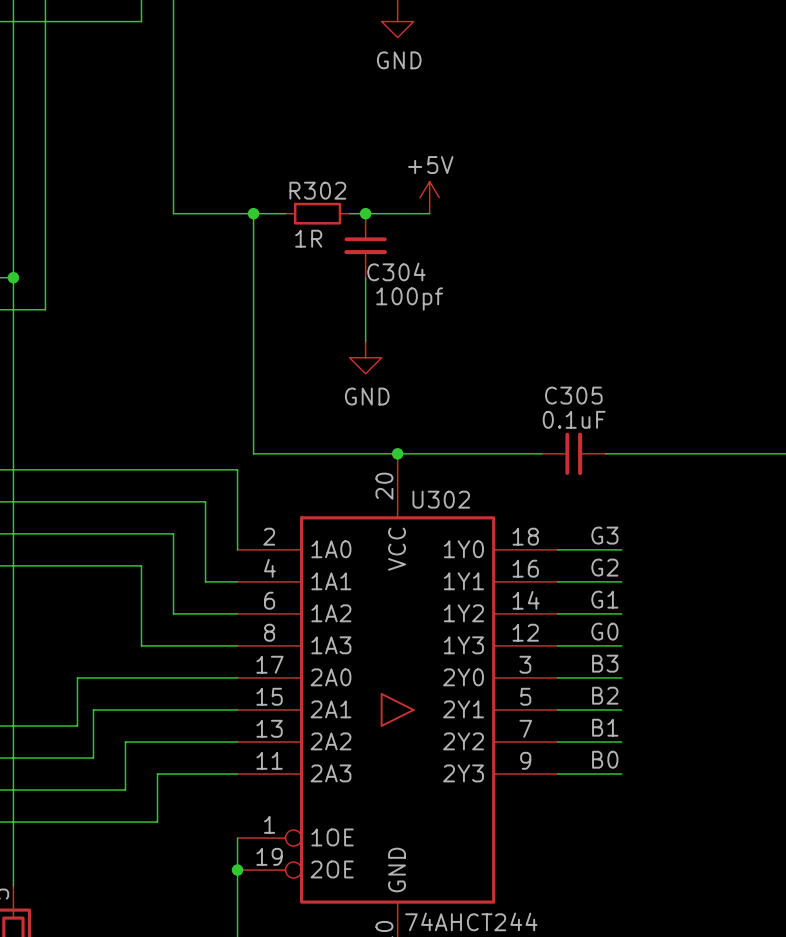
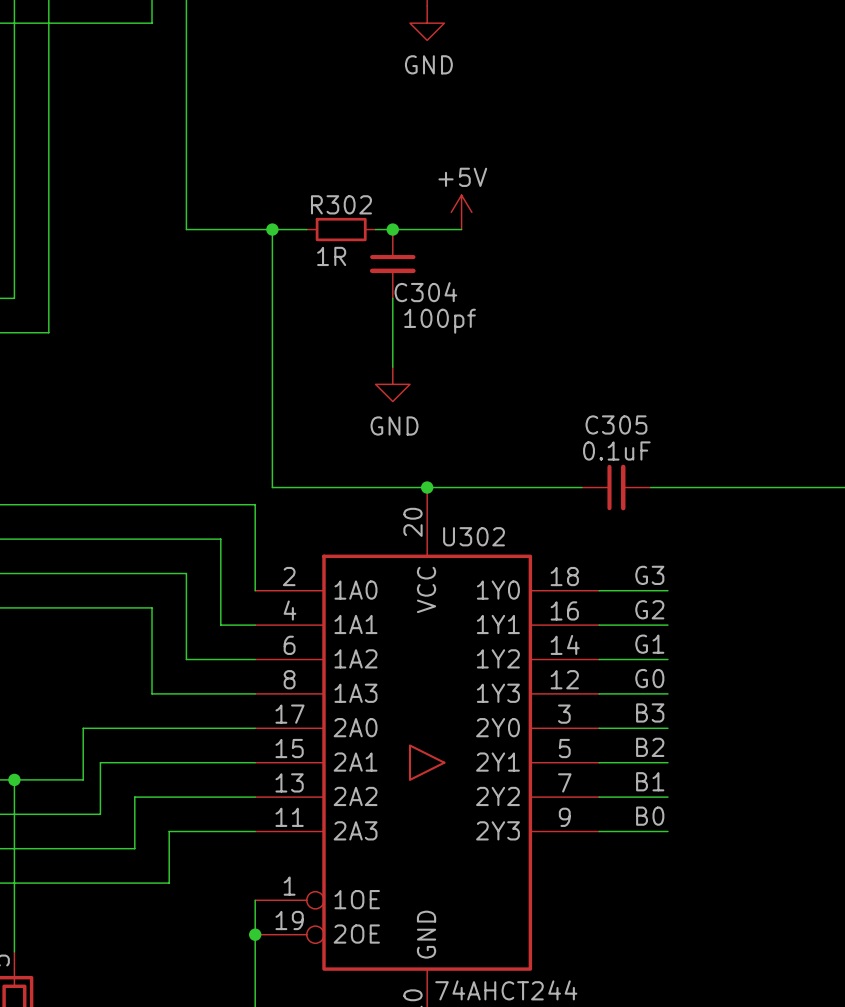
wire: (13, 277) (13, 725) -> none
junction: (13, 277) -> none
junction: none -> (14, 779)

